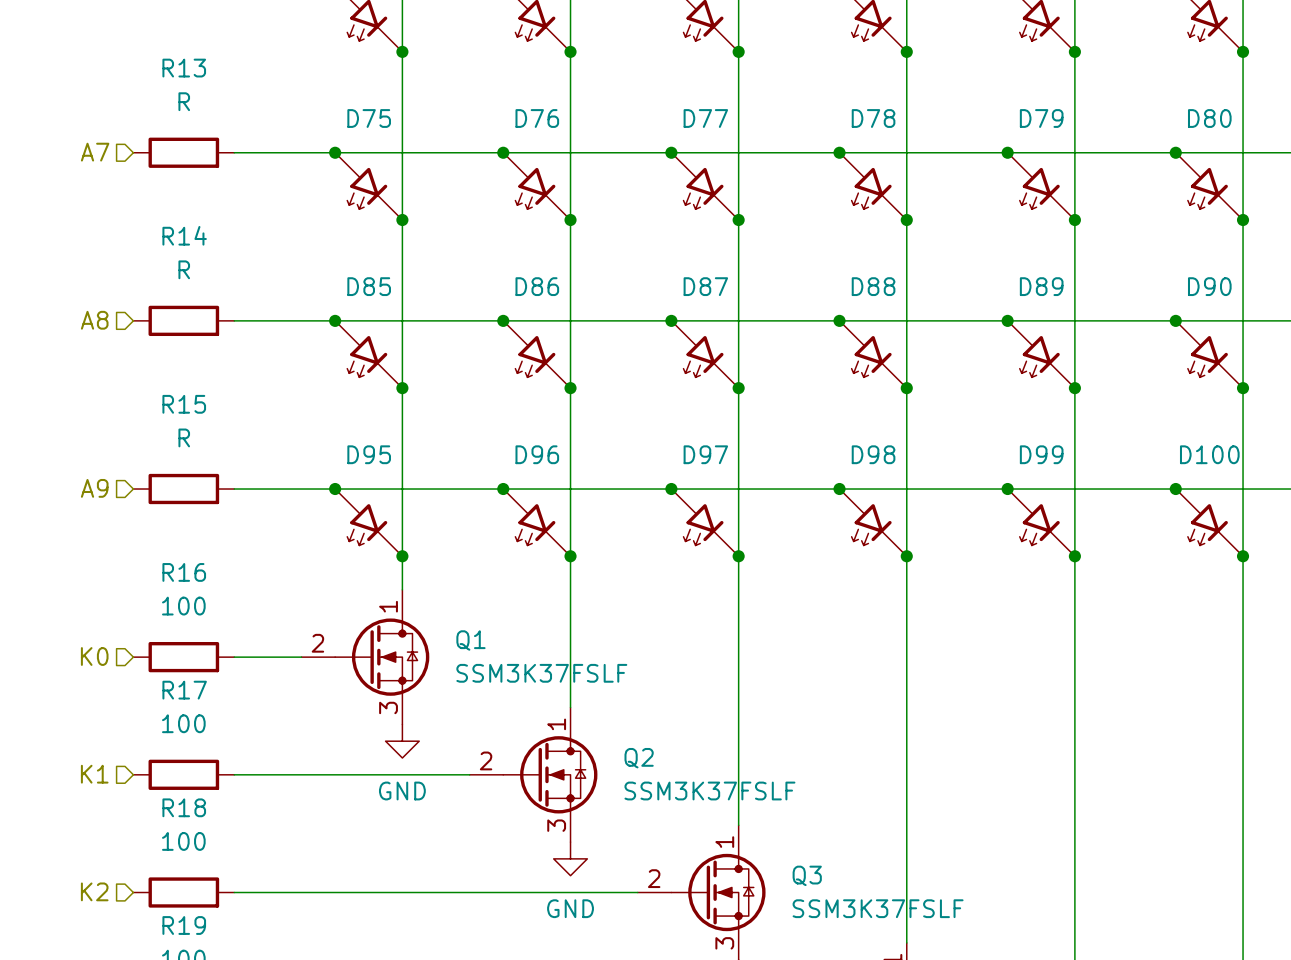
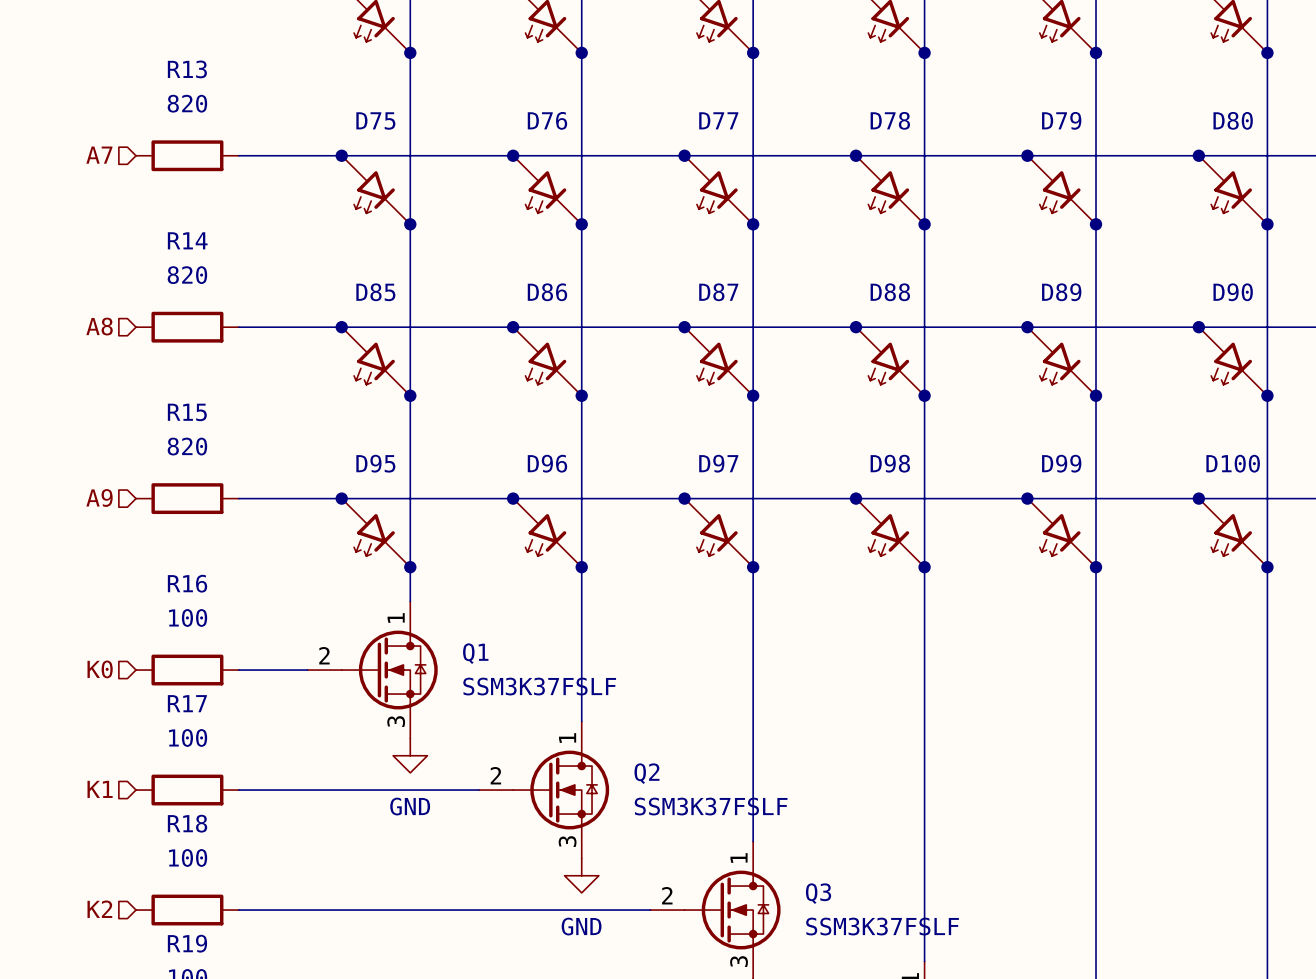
R13 value: R (184, 101) -> 820 (187, 103)
R14 value: R (184, 269) -> 820 (187, 275)
R15 value: R (184, 437) -> 820 (187, 446)

